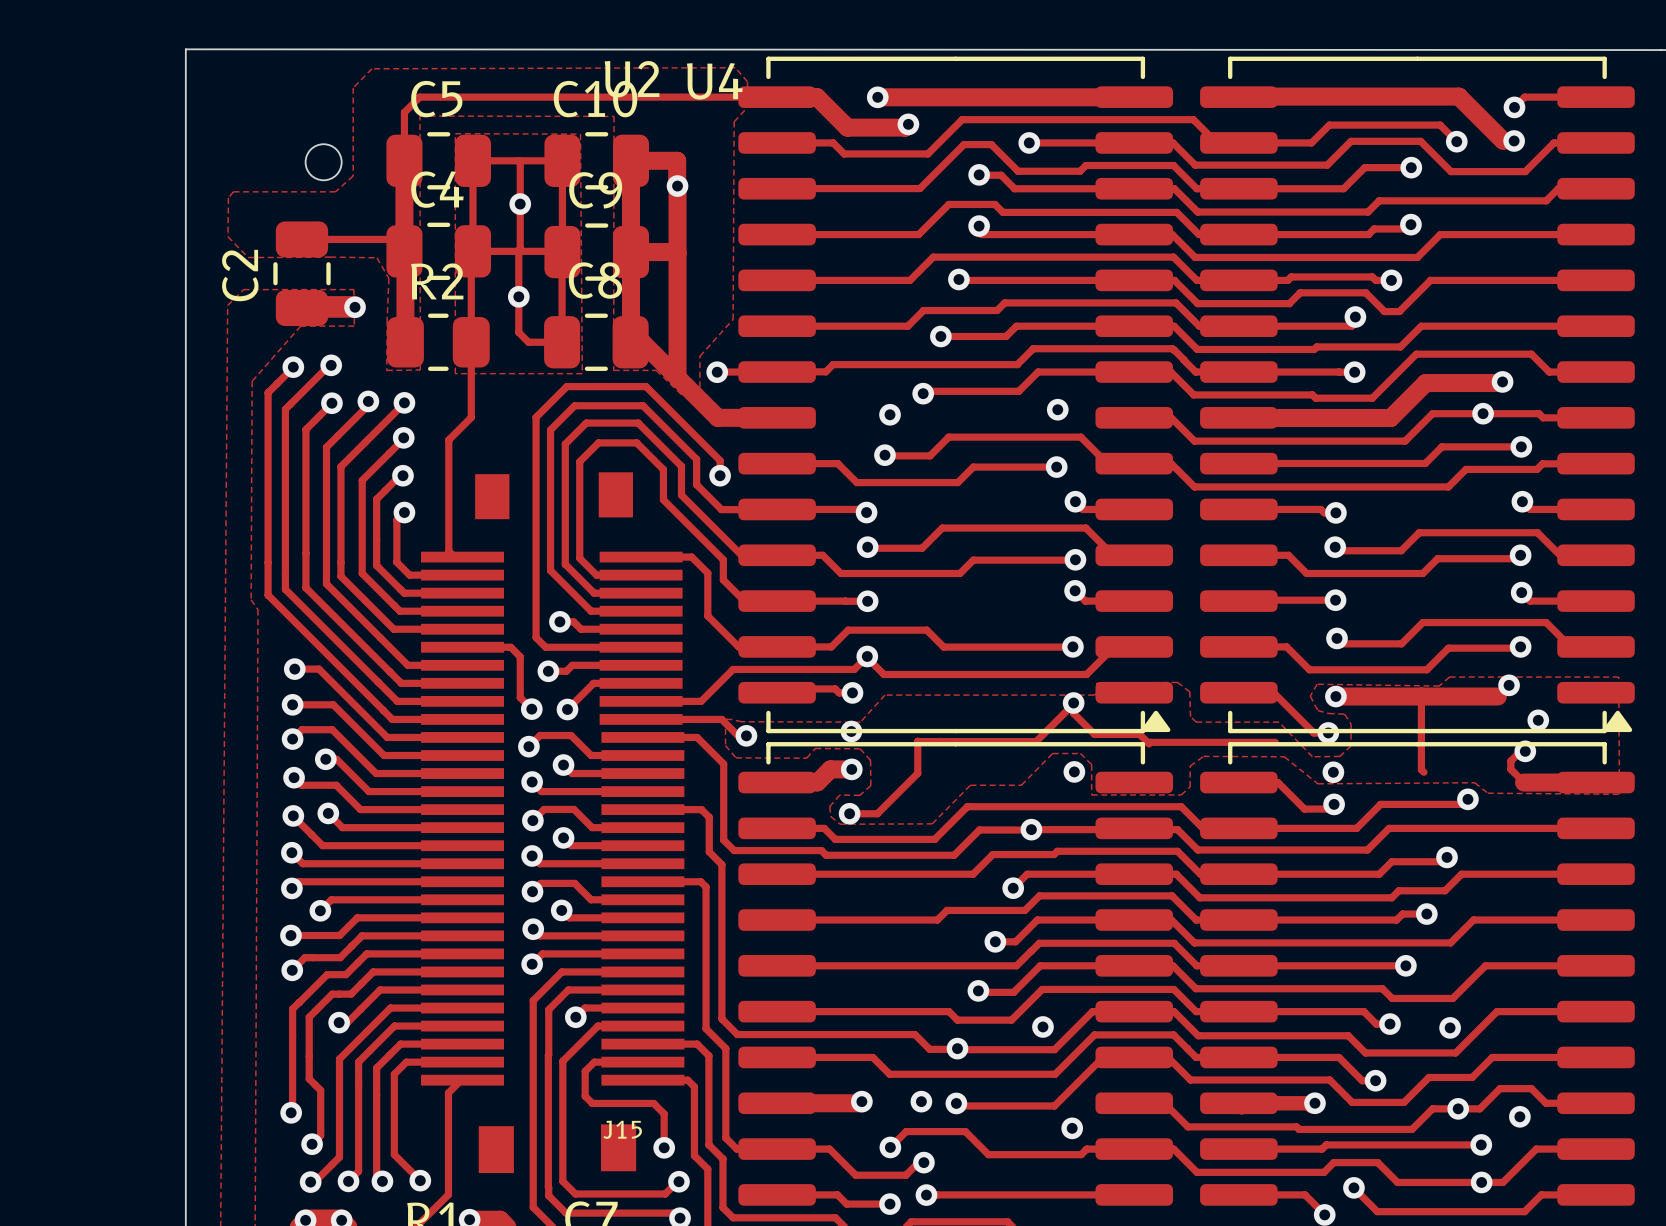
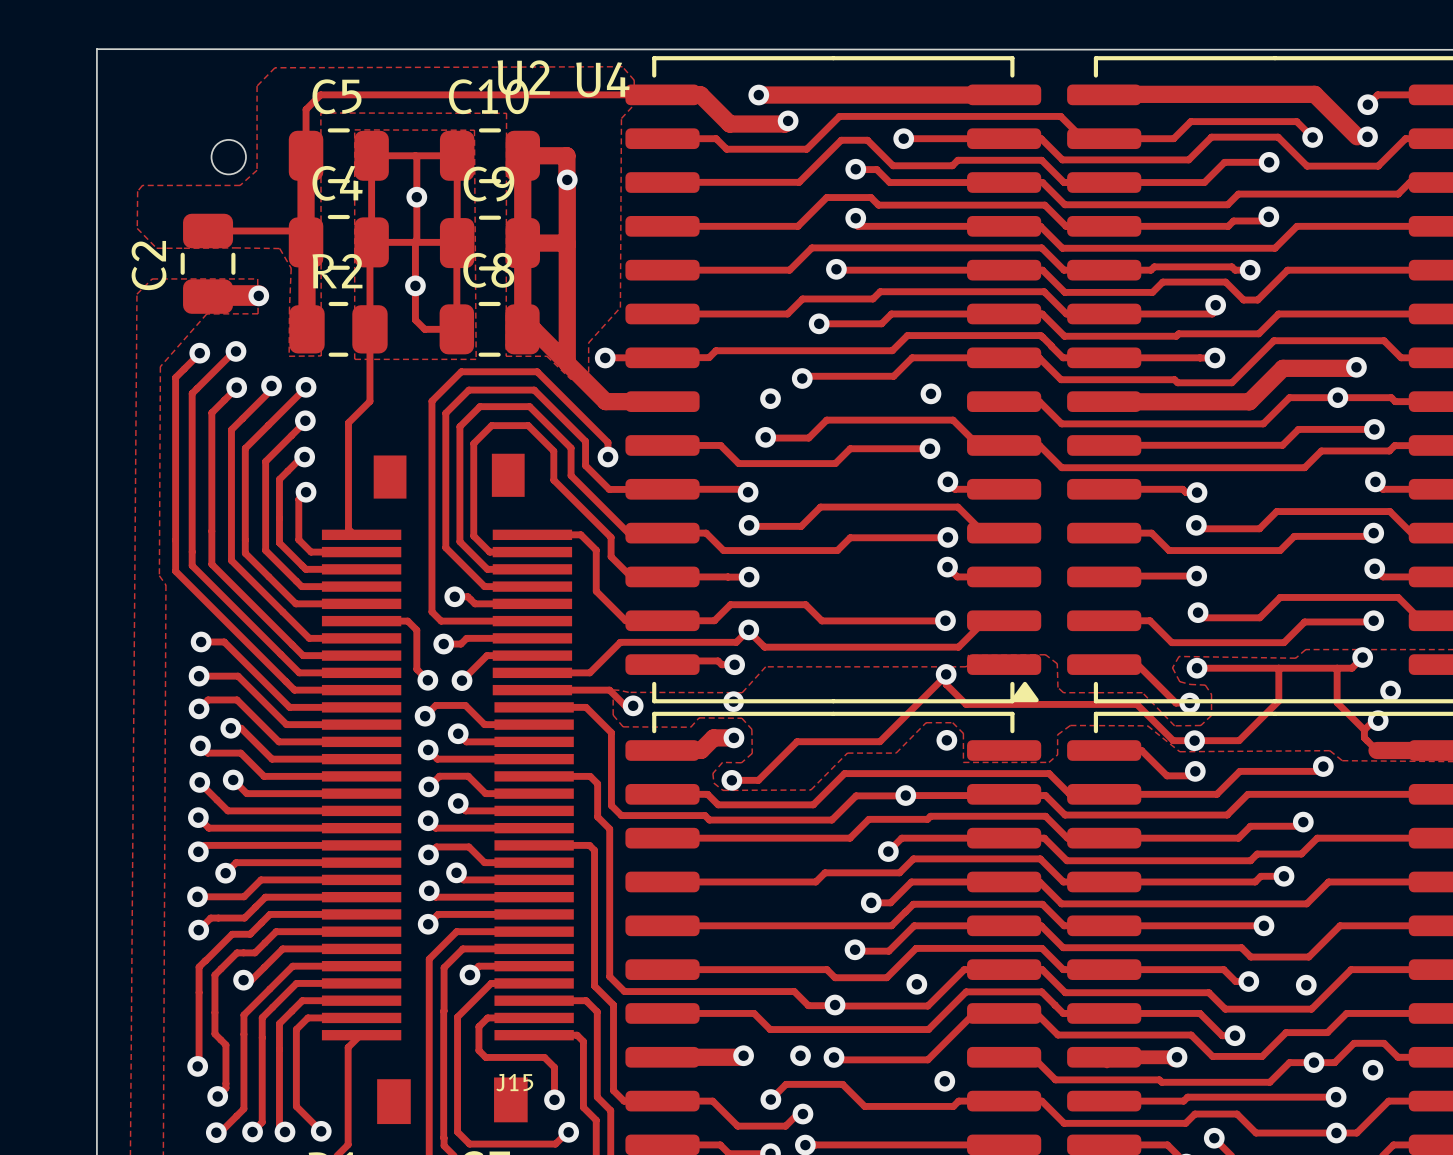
track width: thick (1335, 696) (1497, 696) -> thin (1197, 668) (1351, 668)
track: none -> (1337, 668) (1337, 702) (1364, 729)
track: (1421, 730) (1421, 769) (1423, 772) -> none
track: (1139, 734) (1149, 743) (1275, 742) -> (1009, 704) (1136, 704) (1173, 740) (1239, 740) (1278, 700)
track: (917, 741) (917, 773) -> none
track: (918, 741) (1036, 741) -> (797, 741) (879, 741) (910, 711)

